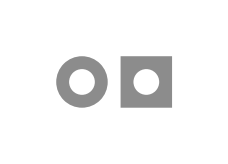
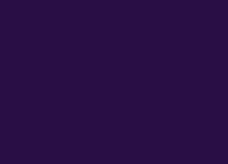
part: (114, 81) -> none

